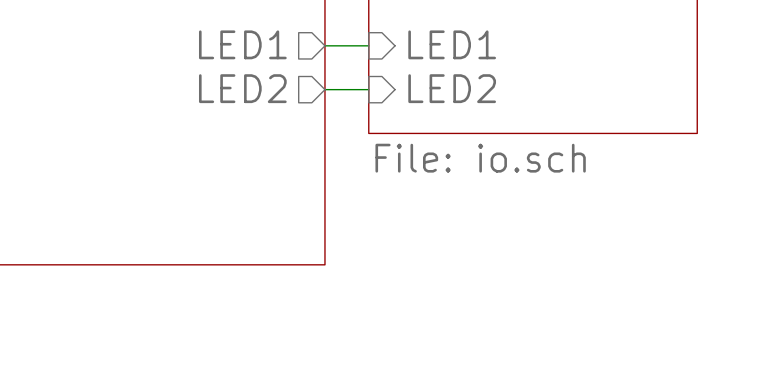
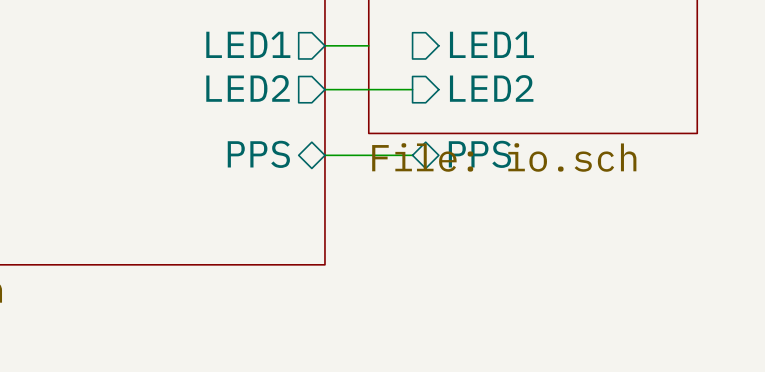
sheet pin position: LED1 (452, 44) -> LED1 (491, 44)
sheet pin position: LED2 (452, 88) -> LED2 (491, 88)
wire: none -> (368, 89) (412, 89)
sheet pin: none -> PPS (258, 154)
sheet pin: none -> PPS (479, 154)
wire: none -> (324, 155) (412, 155)

